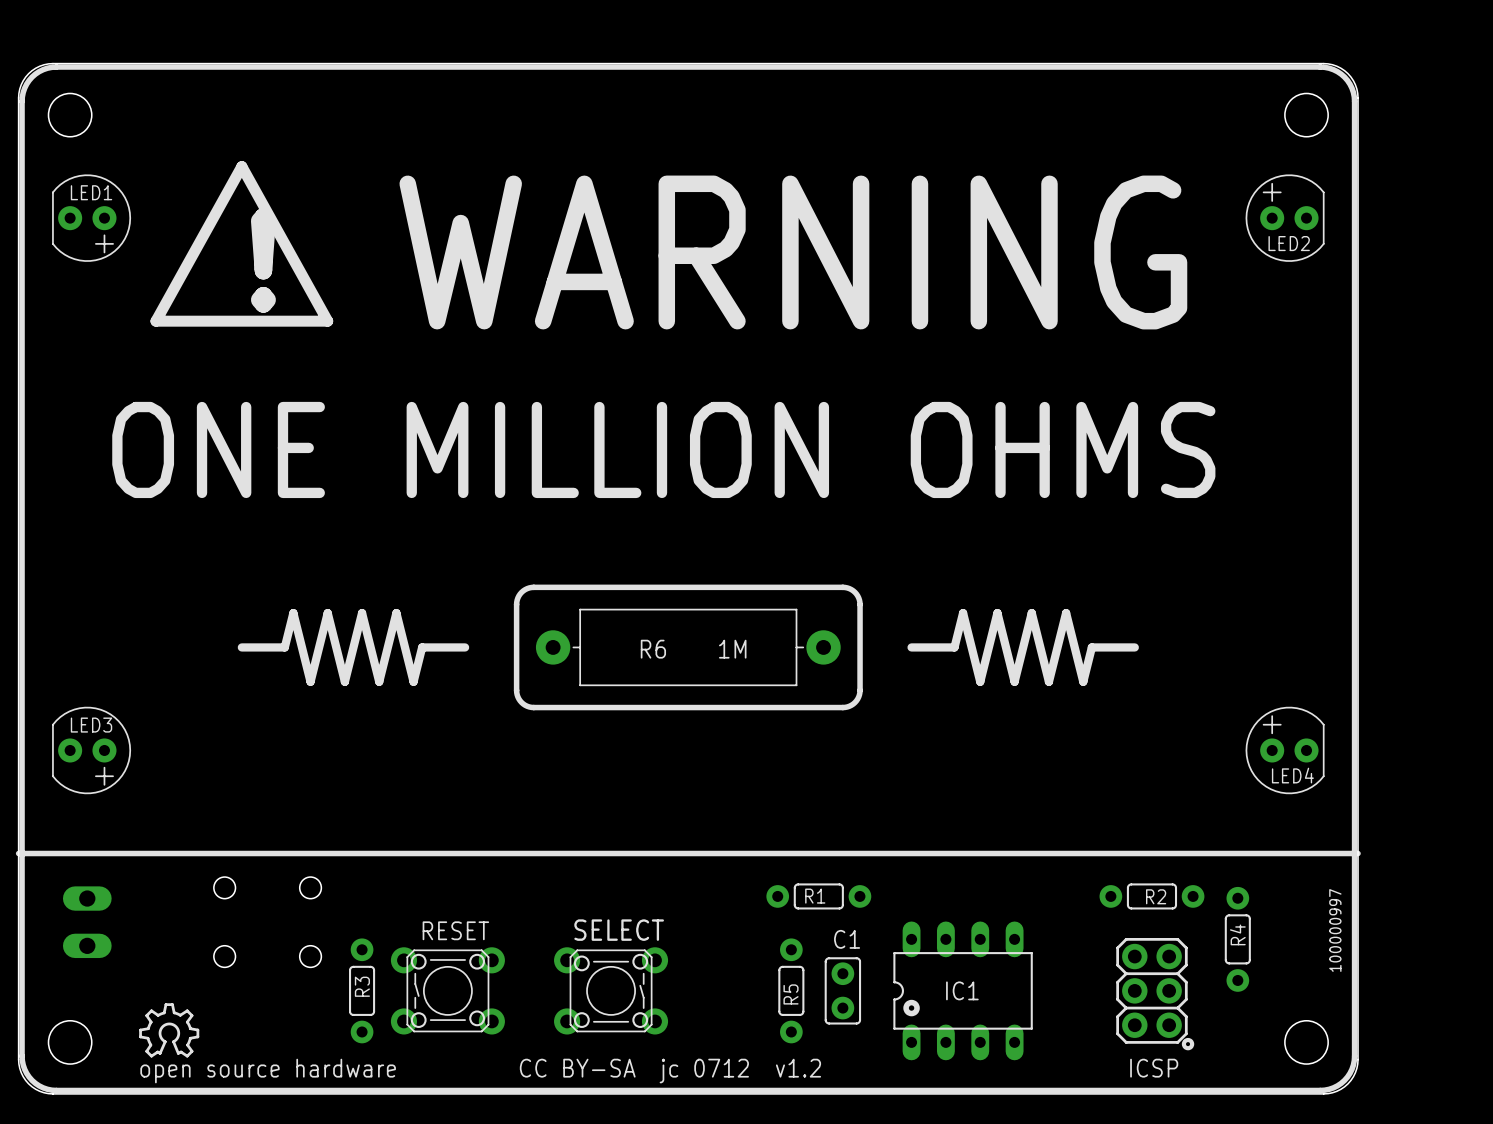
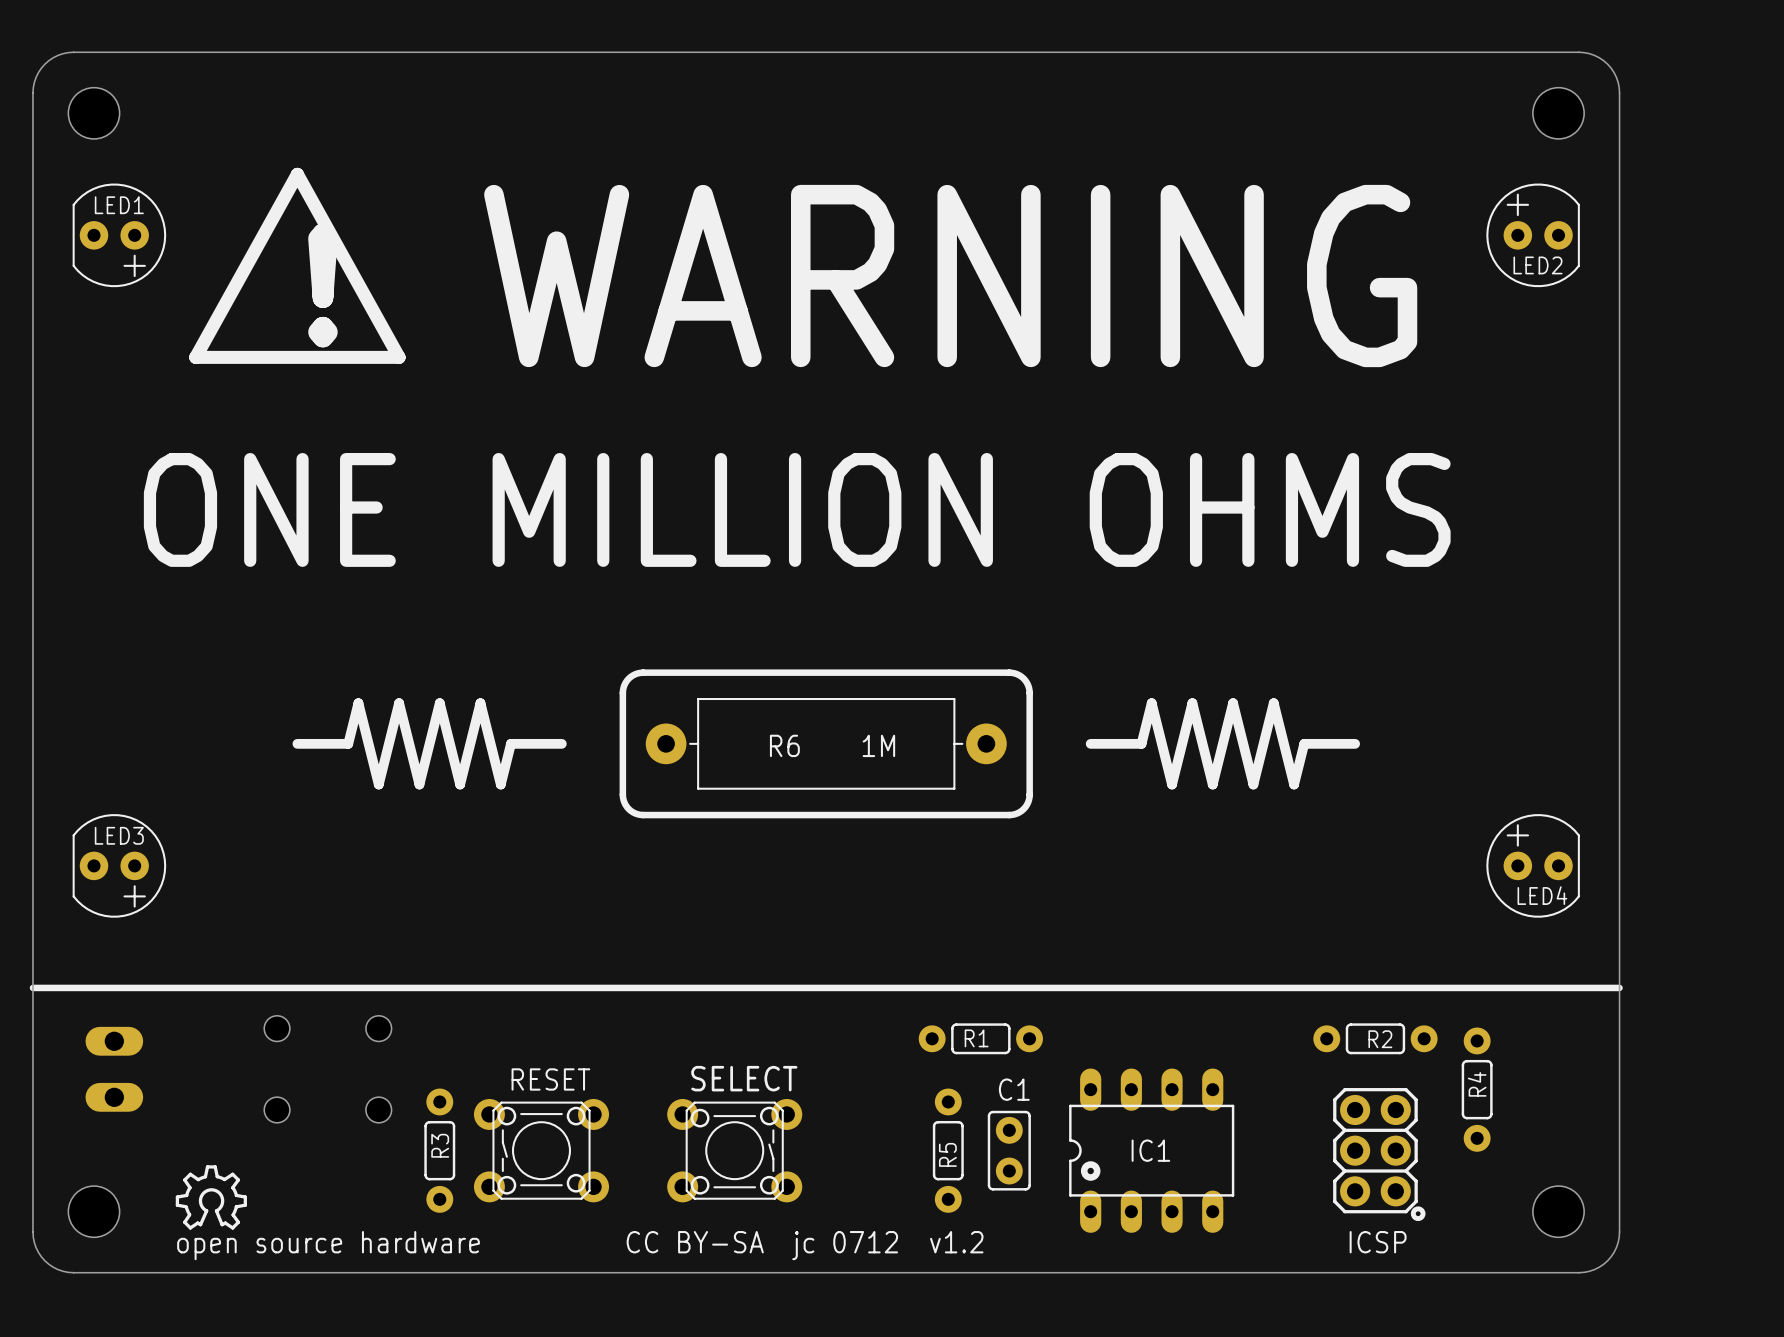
line: (56, 67) (1320, 67) (1329, 68) (1341, 74) (1351, 88) (1354, 101) (1354, 1056) (1353, 1065) (1347, 1077) (1333, 1087) (1320, 1090) (56, 1090) (47, 1089) (35, 1083) (24, 1069) (22, 1056) (22, 101) (24, 88) (32, 77) (43, 69) (56, 67) -> none
text: 100000997 (1335, 930) -> none

